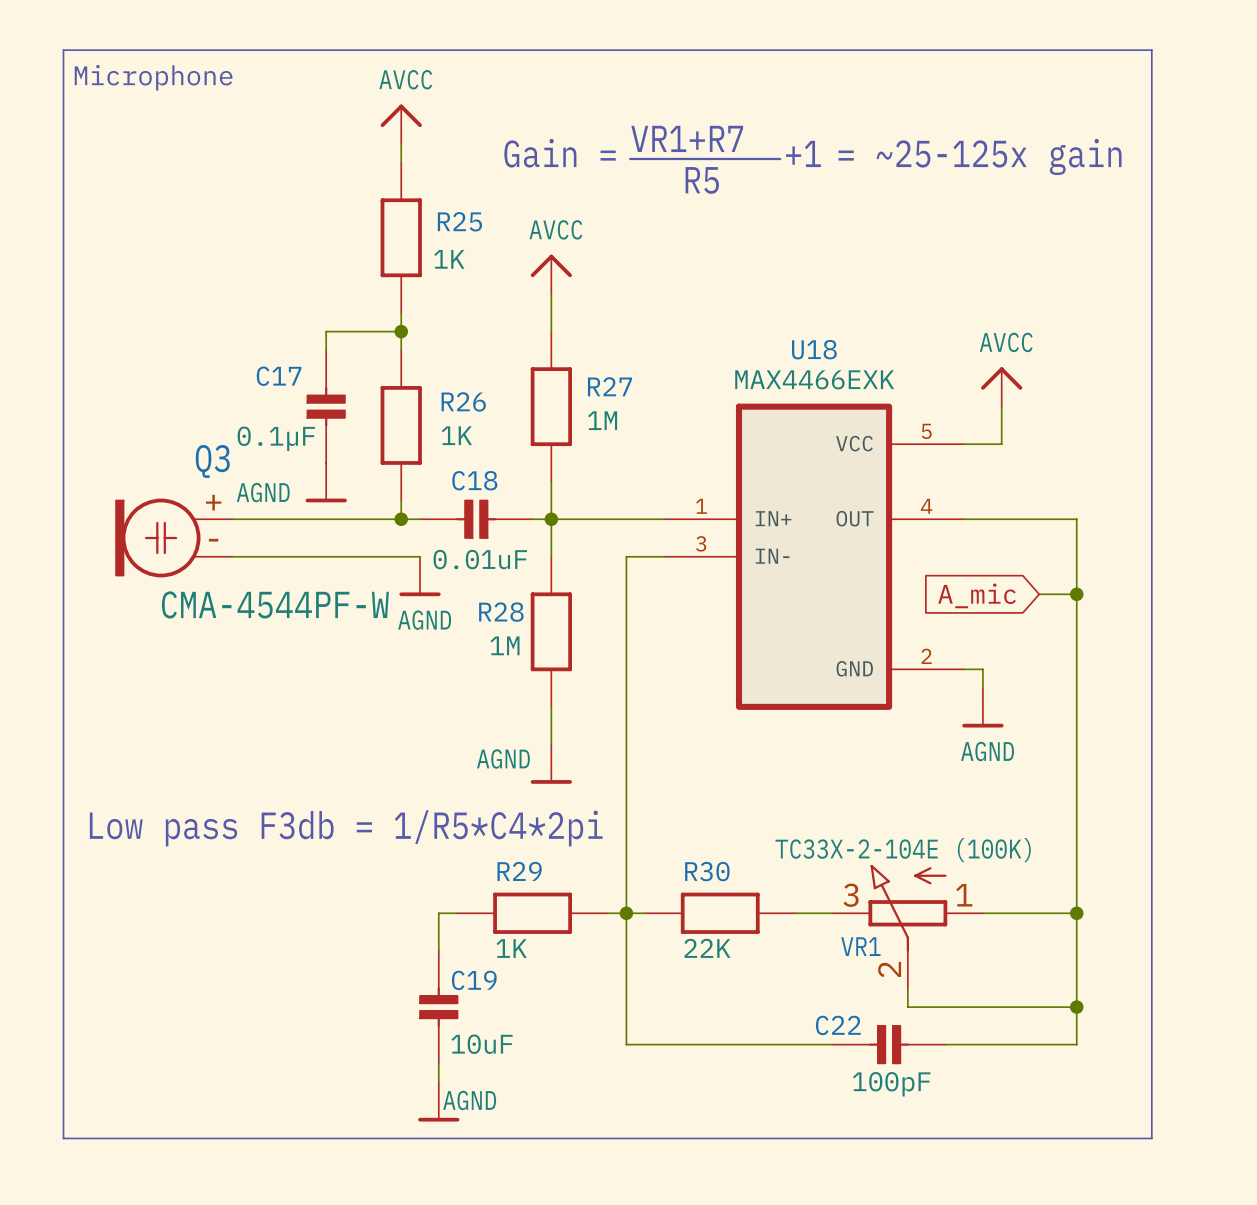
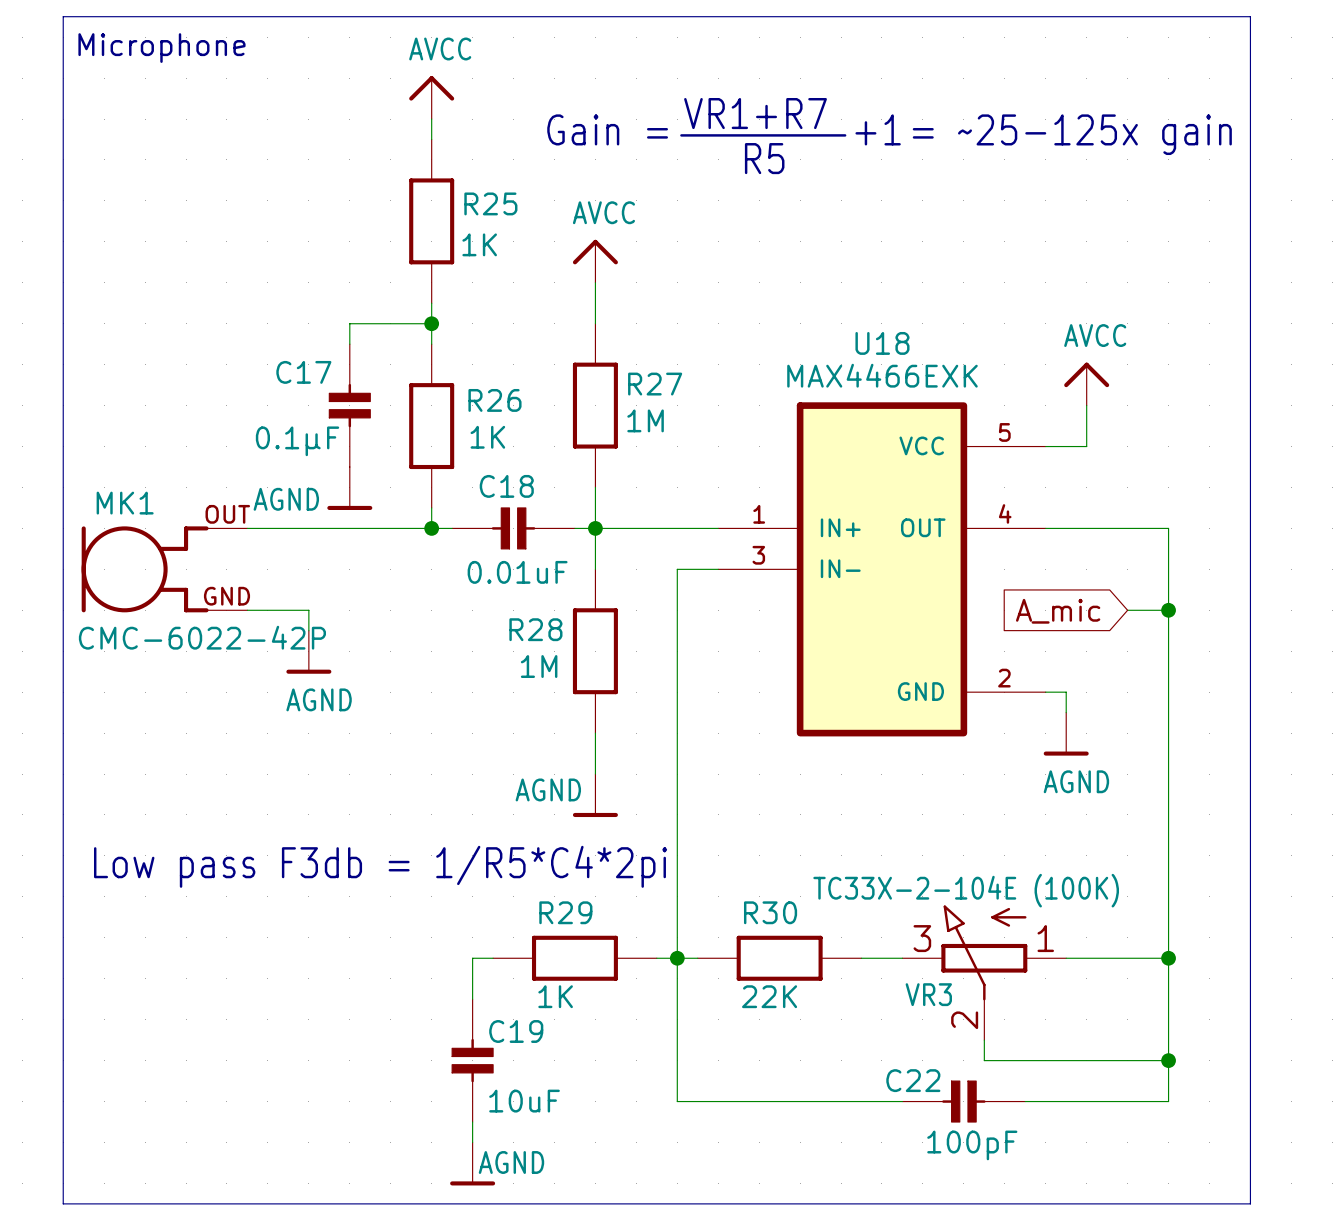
Q3: CMA-4544PF-W (174, 538) -> none
MK1: none -> CMC-6022-42P (164, 569)
wire: (232, 556) (420, 556) -> none
power symbol position: AGND (420, 576) -> AGND (308, 652)
wire: none -> (247, 610) (308, 610) (308, 630)
VR1 name: VR1 (860, 946) -> VR3 (928, 994)

